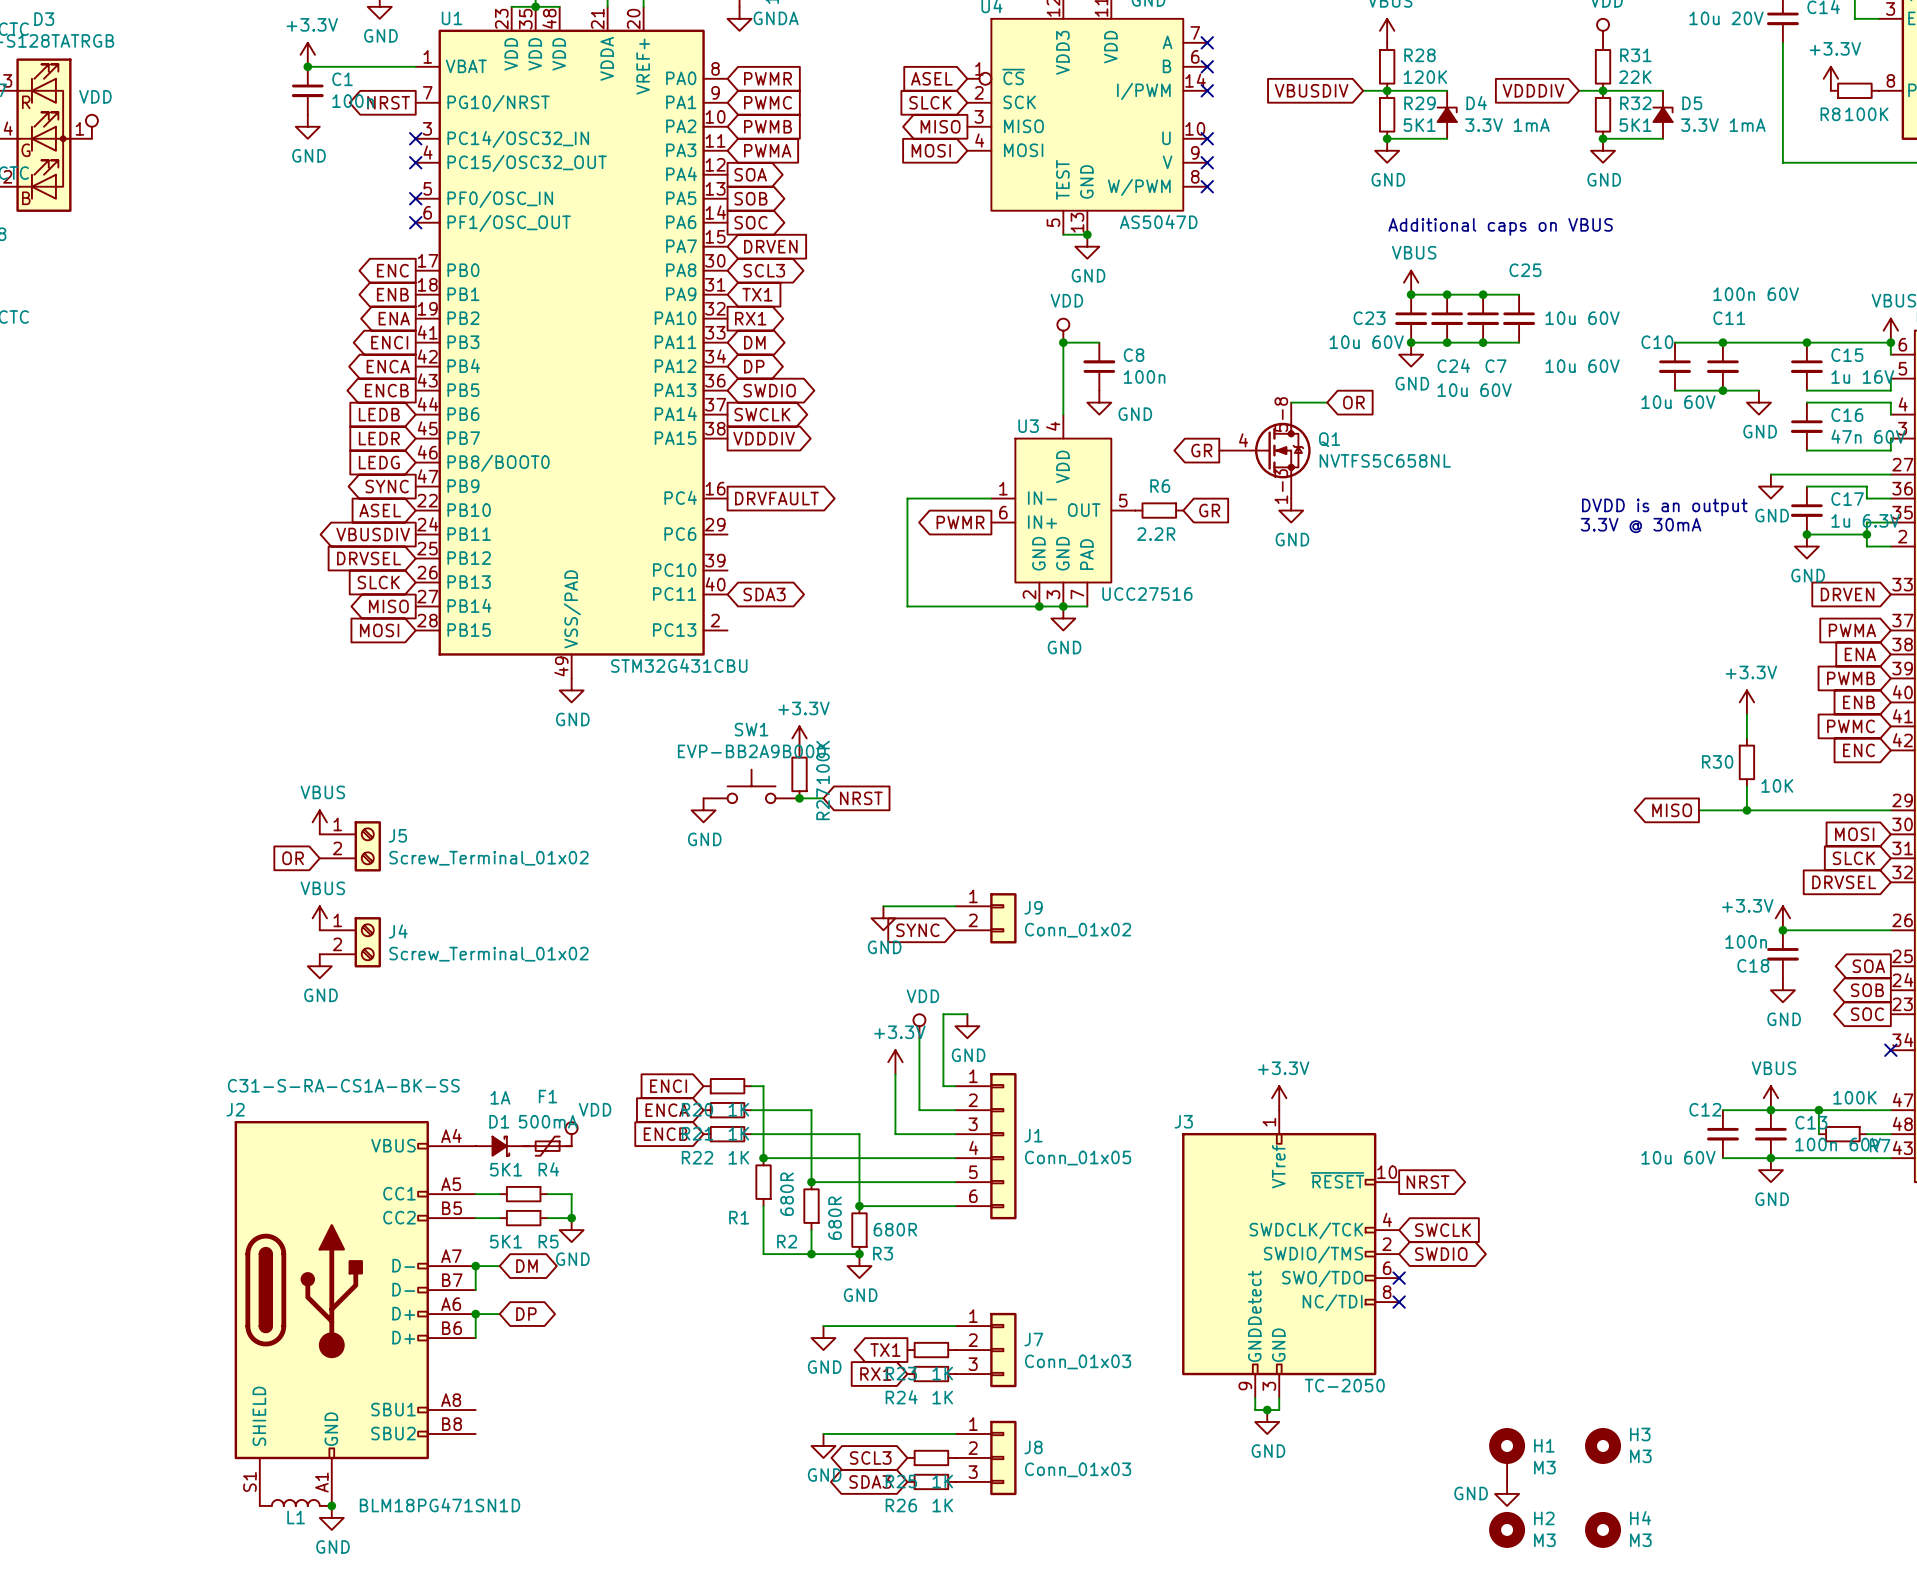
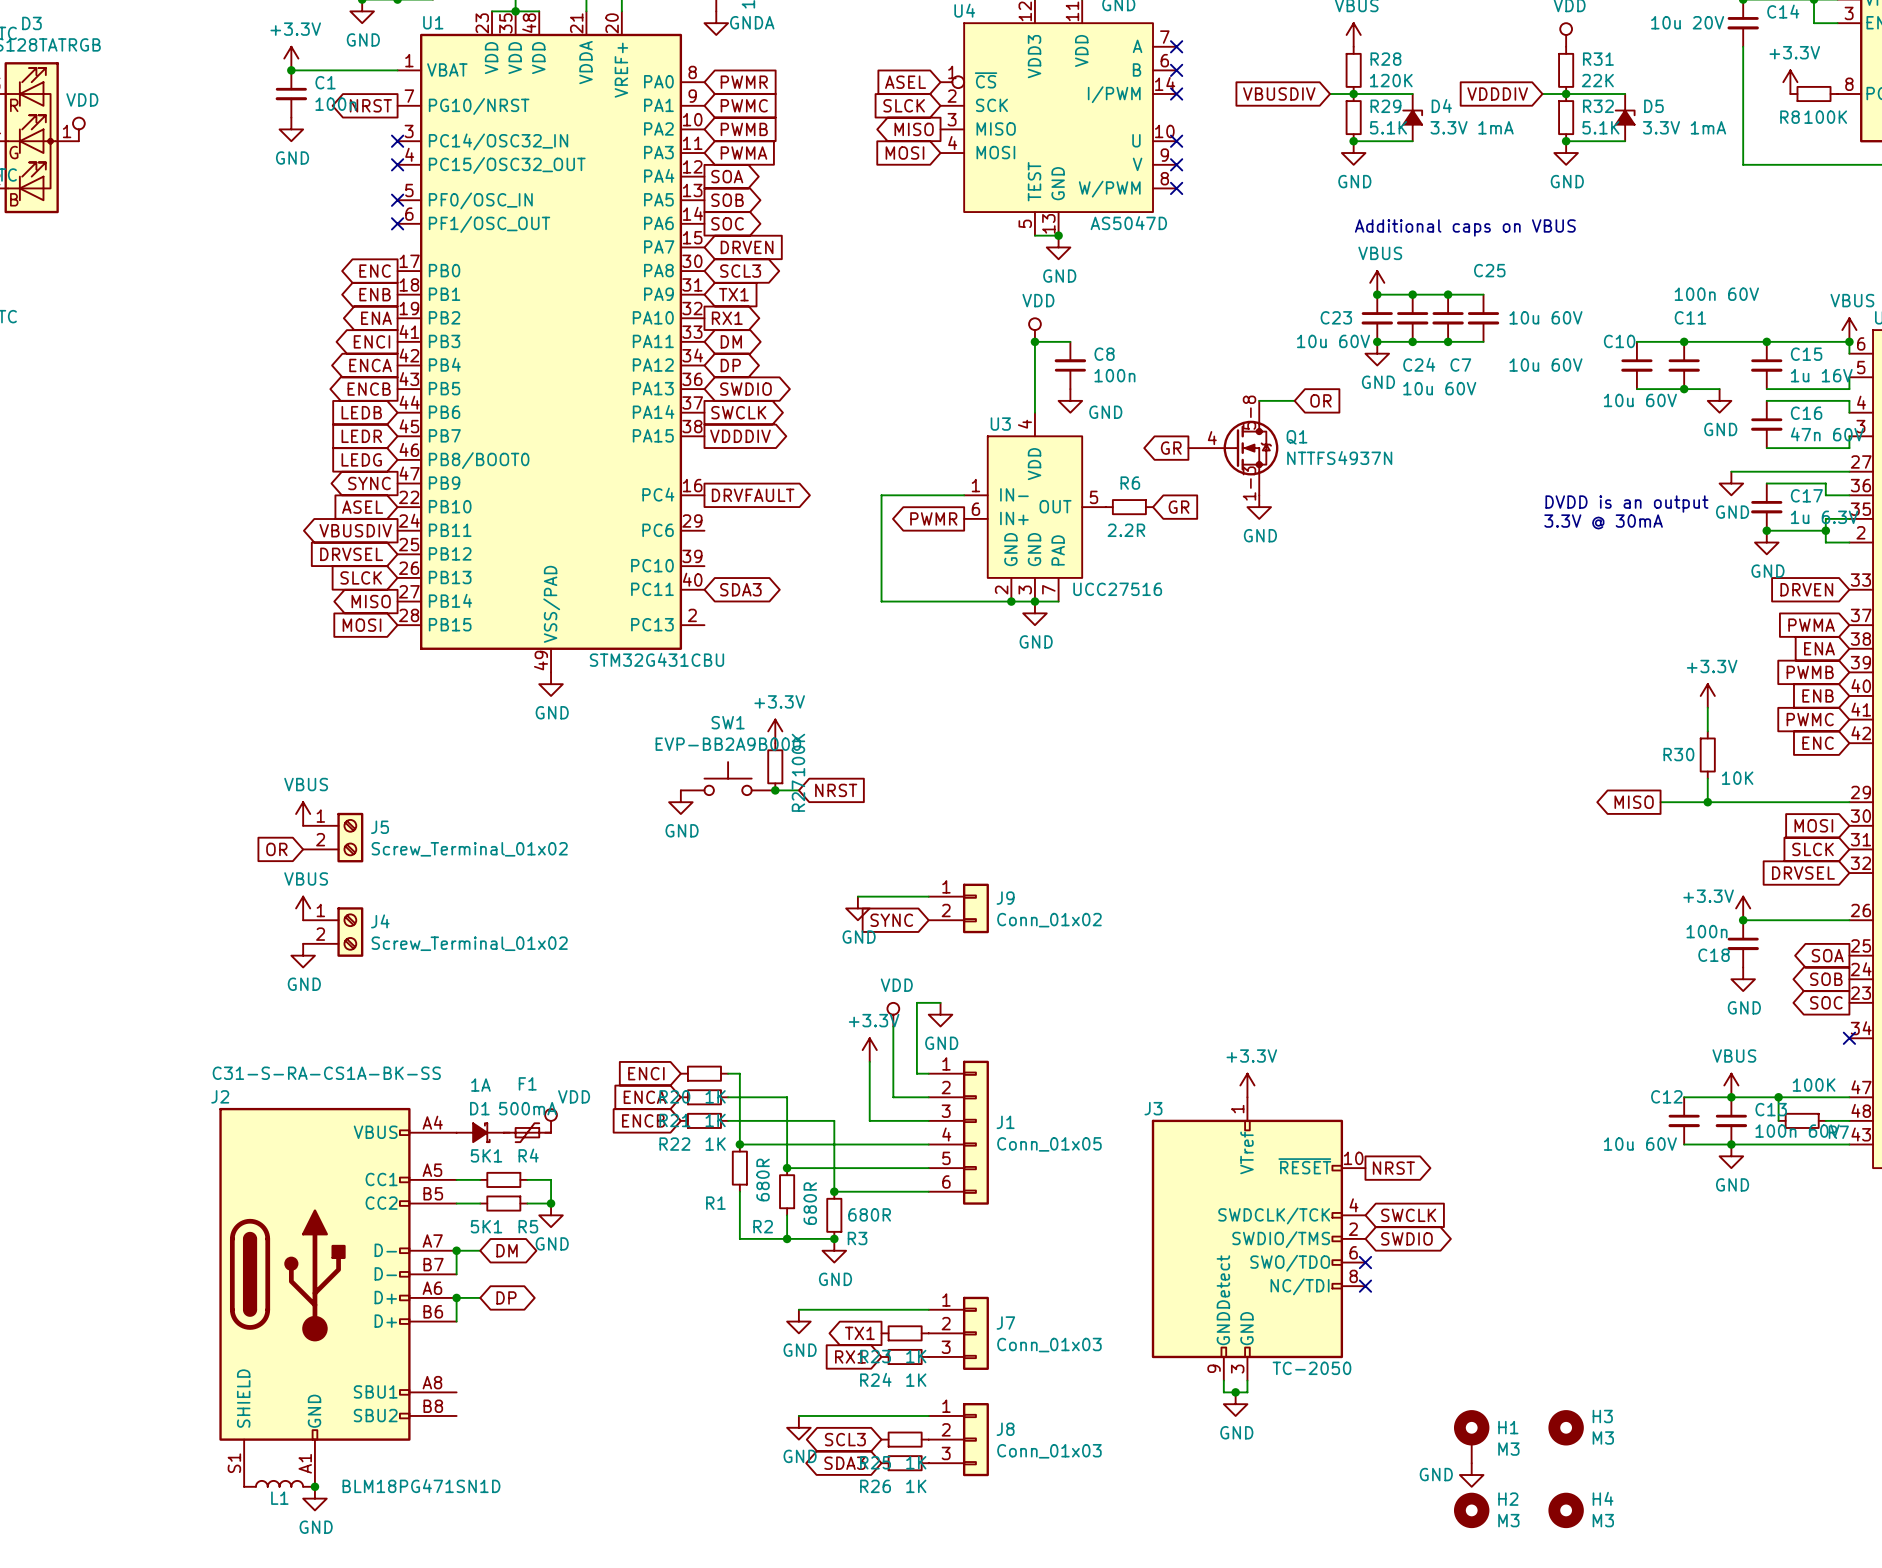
R29 value: 5K1 (1419, 125) -> 5.1K (1388, 127)
R32 value: 5K1 (1635, 125) -> 5.1K (1600, 127)
Q1 value: NVTFS5C658NL (1385, 460) -> NTTFS4937N (1339, 458)

